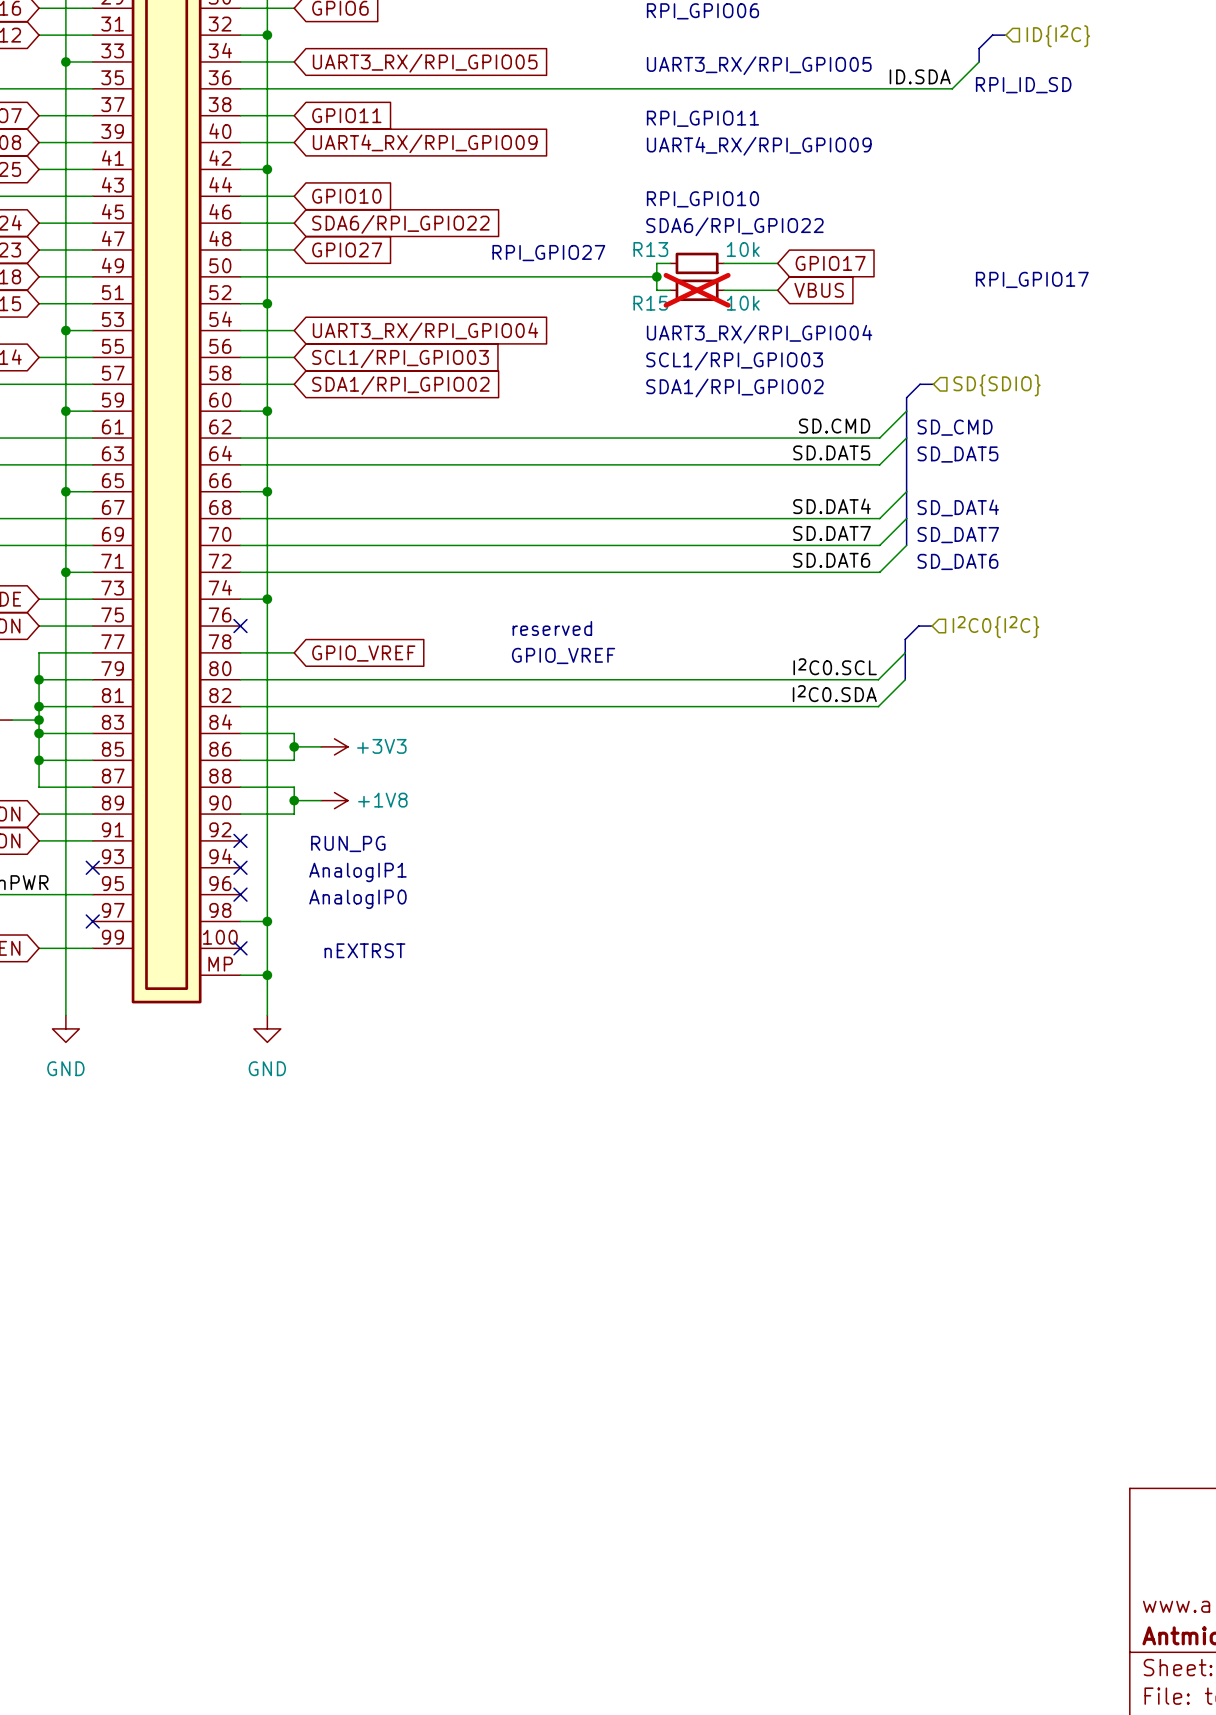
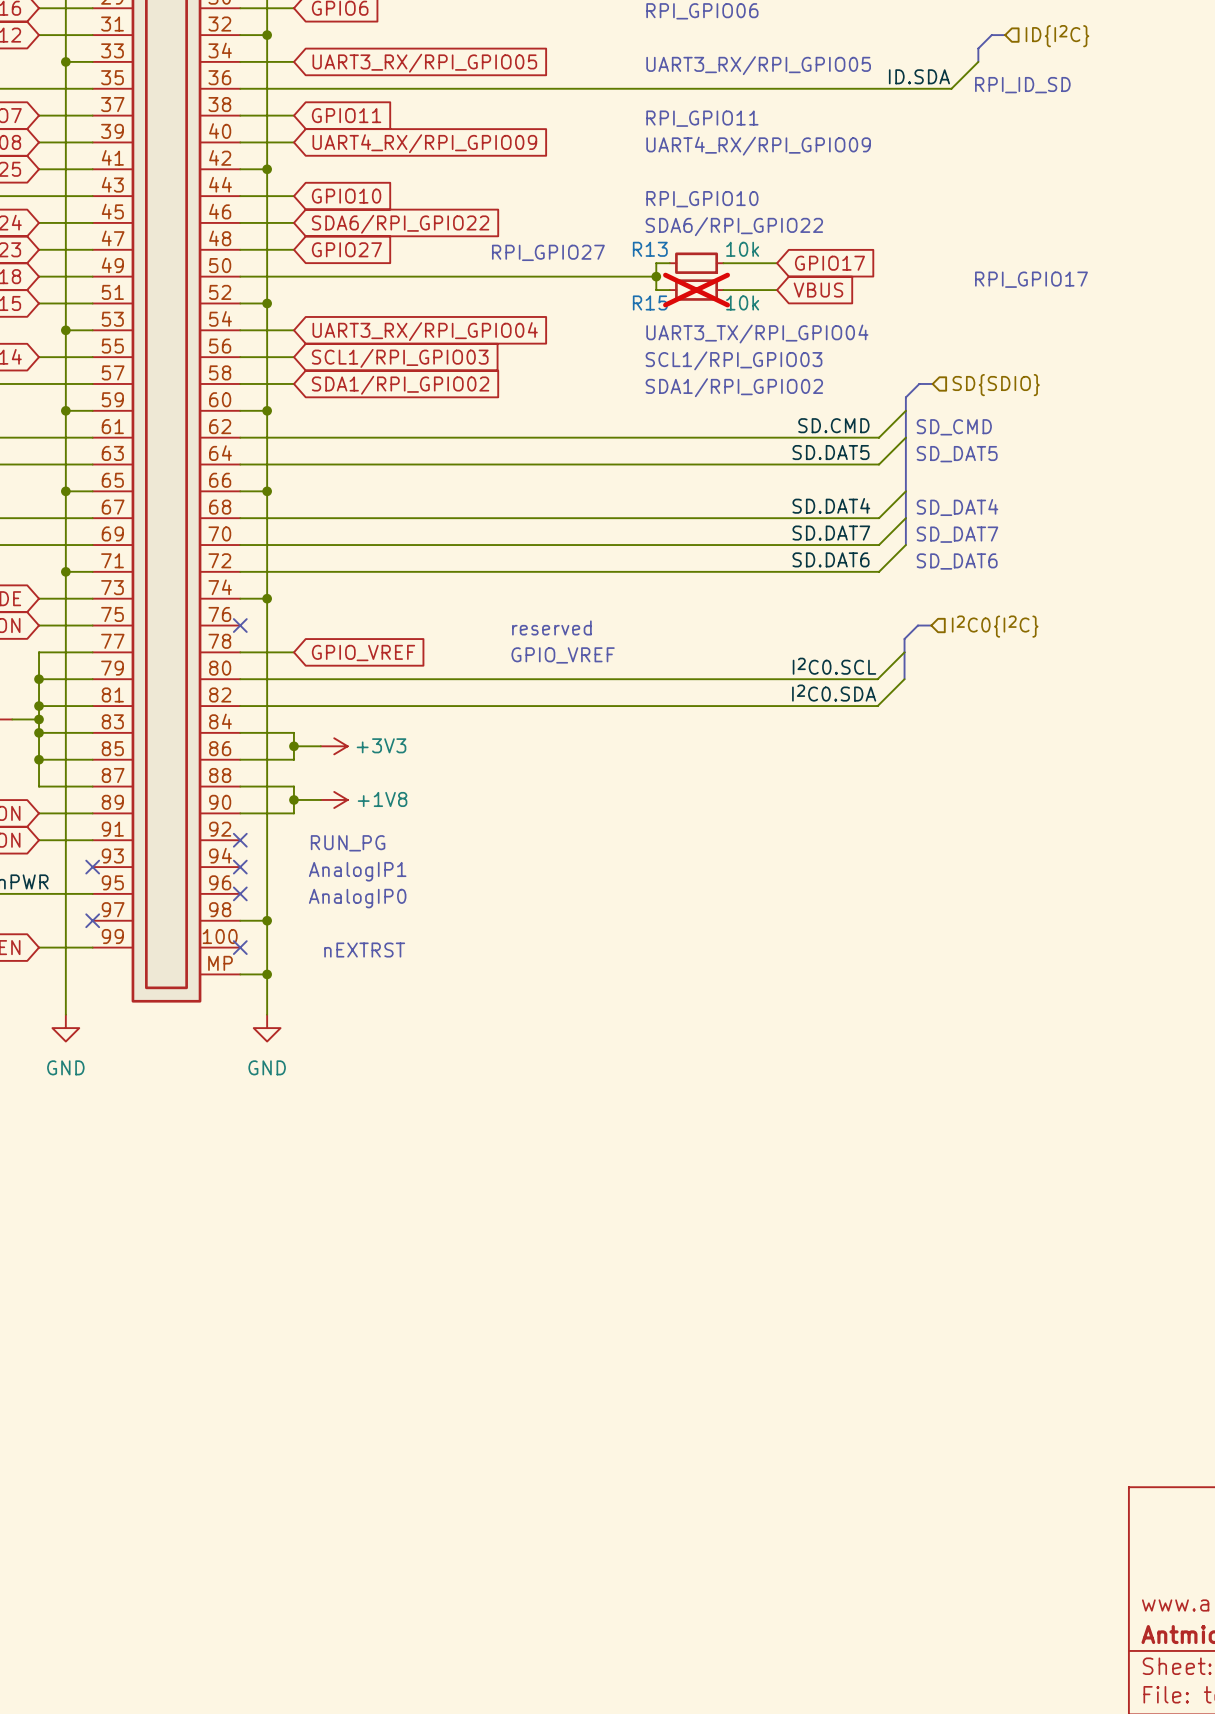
text: UART3_RX/RPI_GPIO04 (759, 334) -> UART3_TX/RPI_GPIO04 (757, 334)

